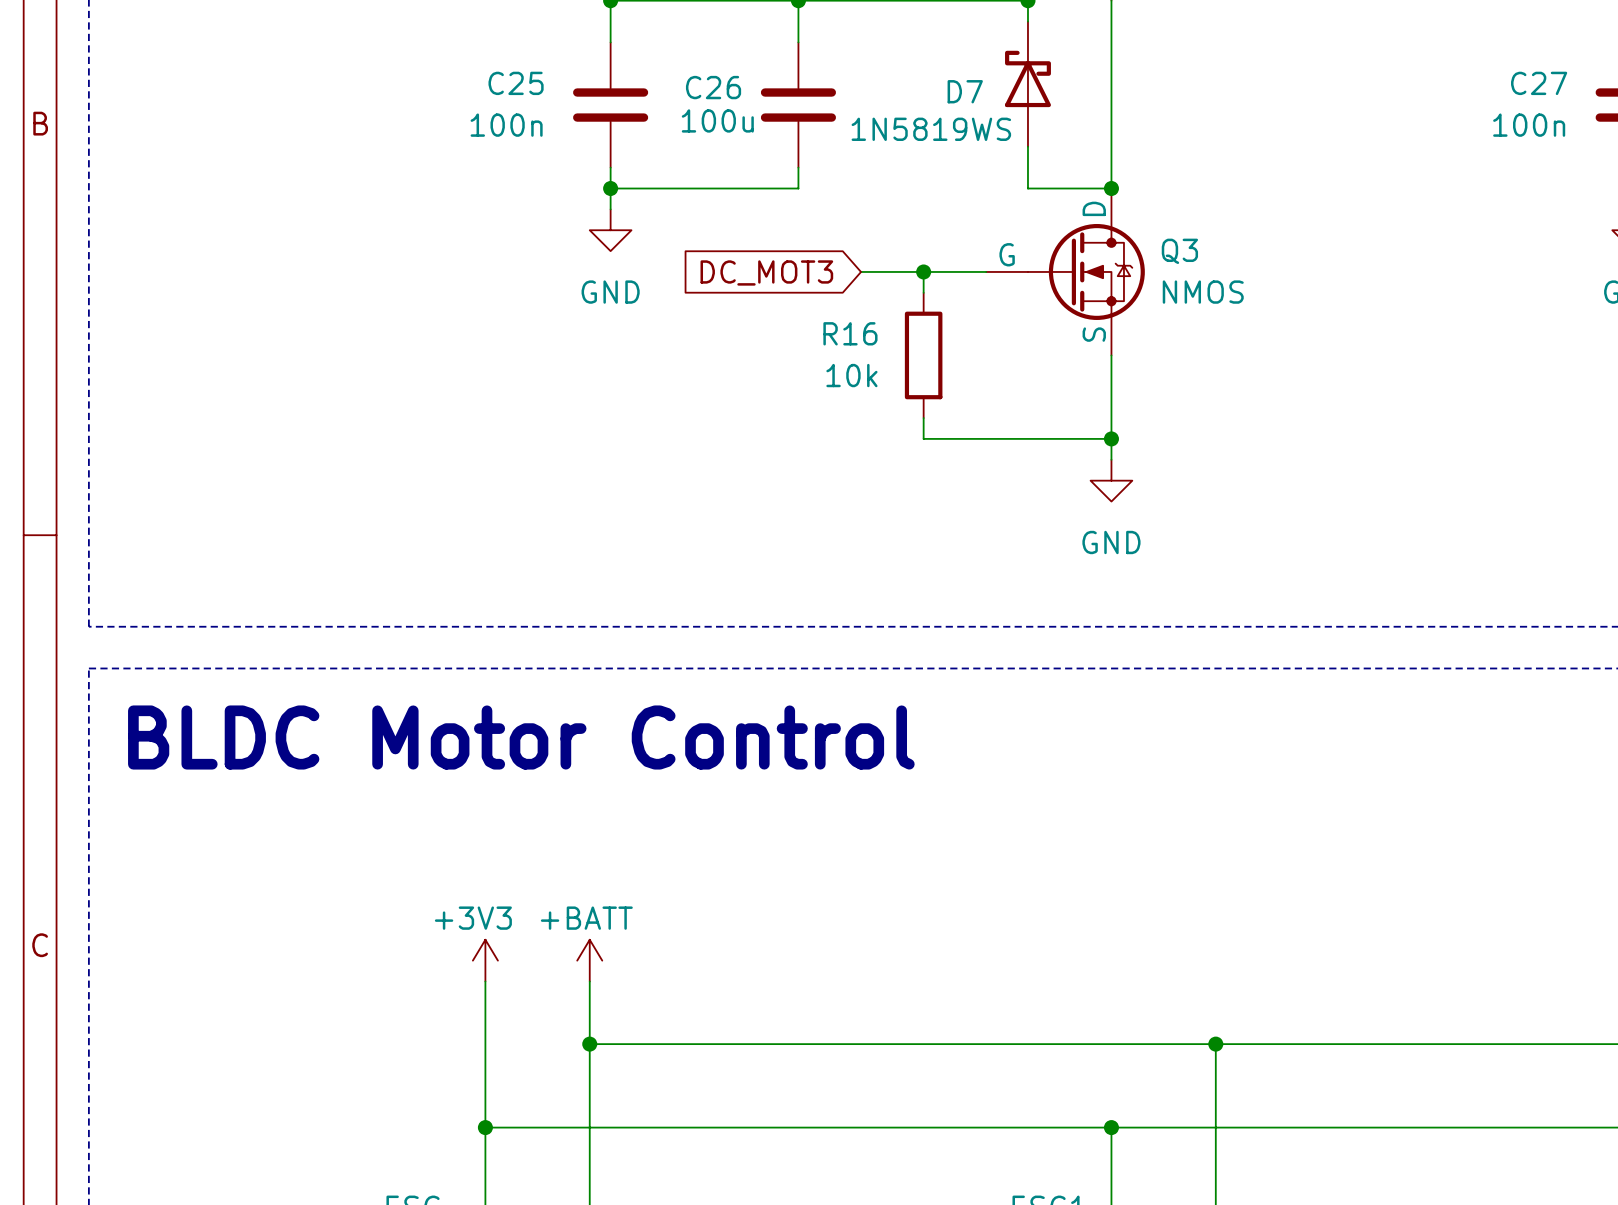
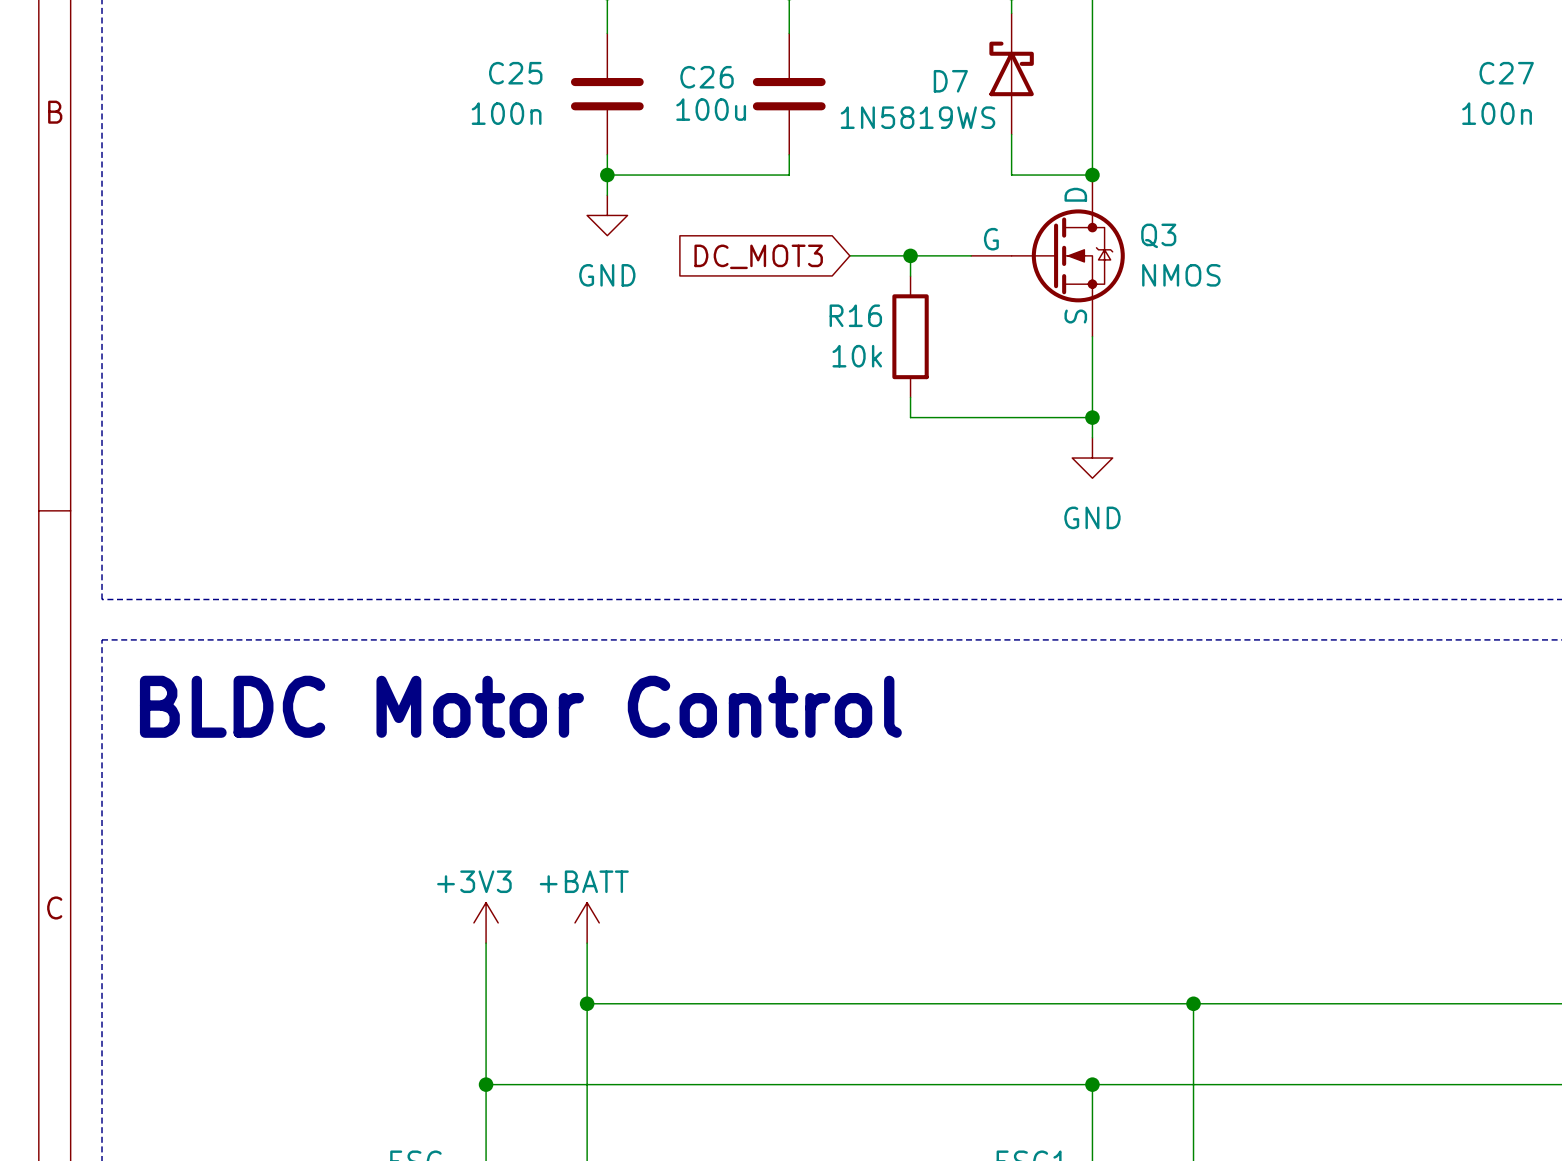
R16 name position: R16 (850, 333) -> R16 (855, 315)
R16 value position: 10k (851, 375) -> 10k (857, 356)

